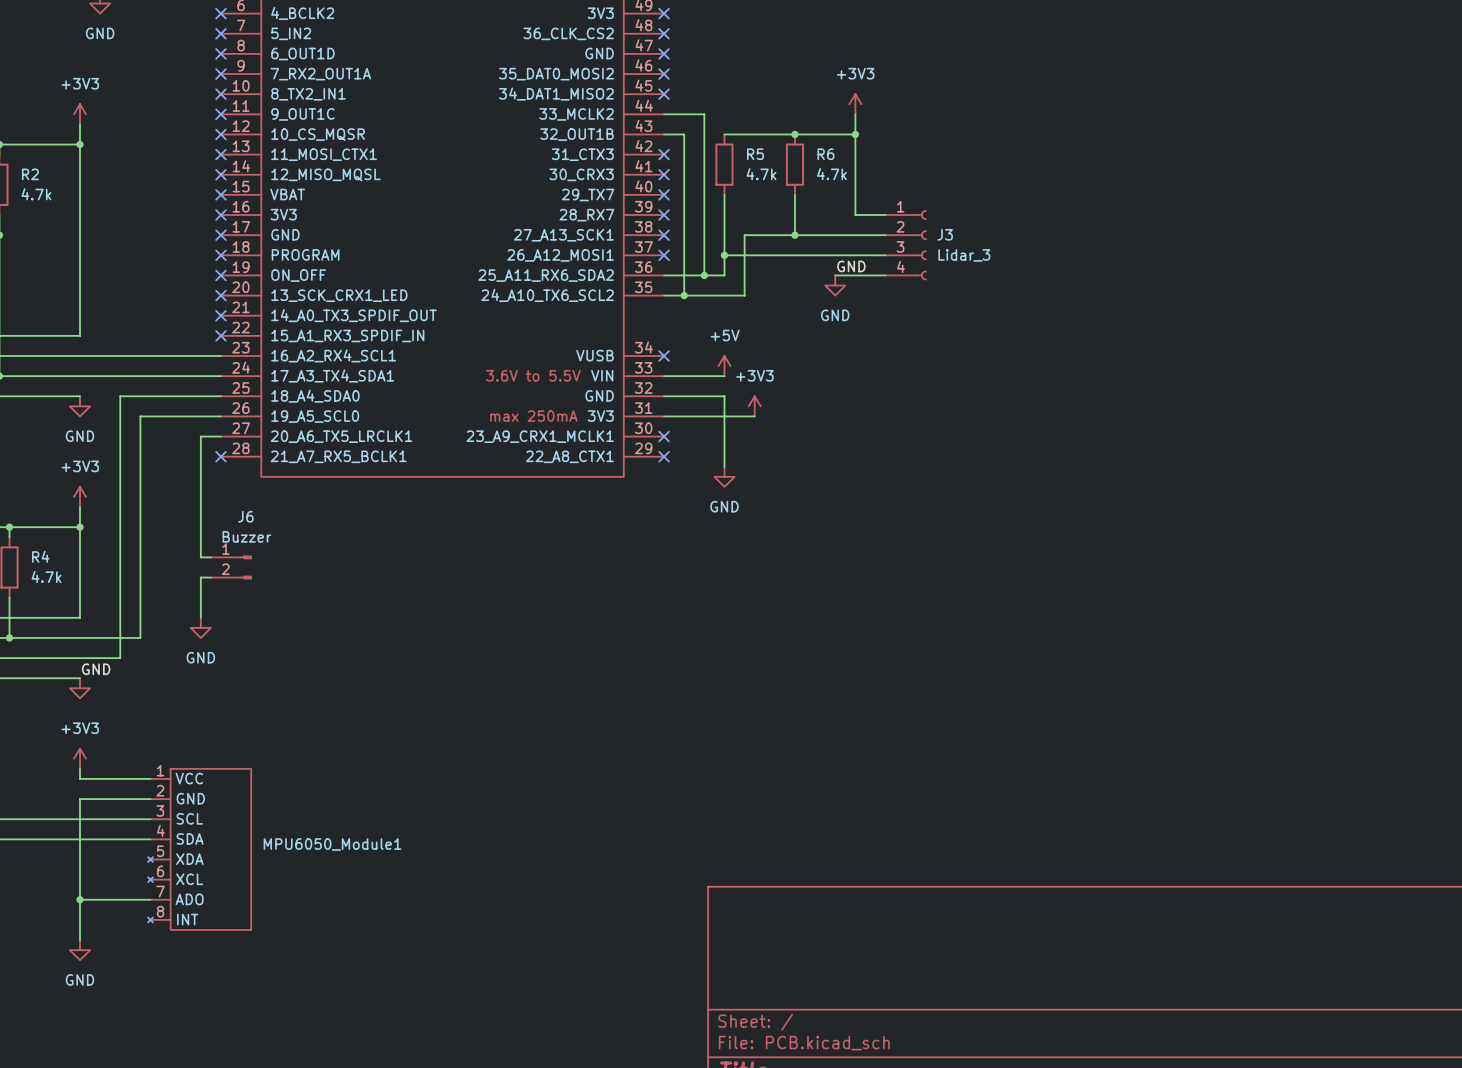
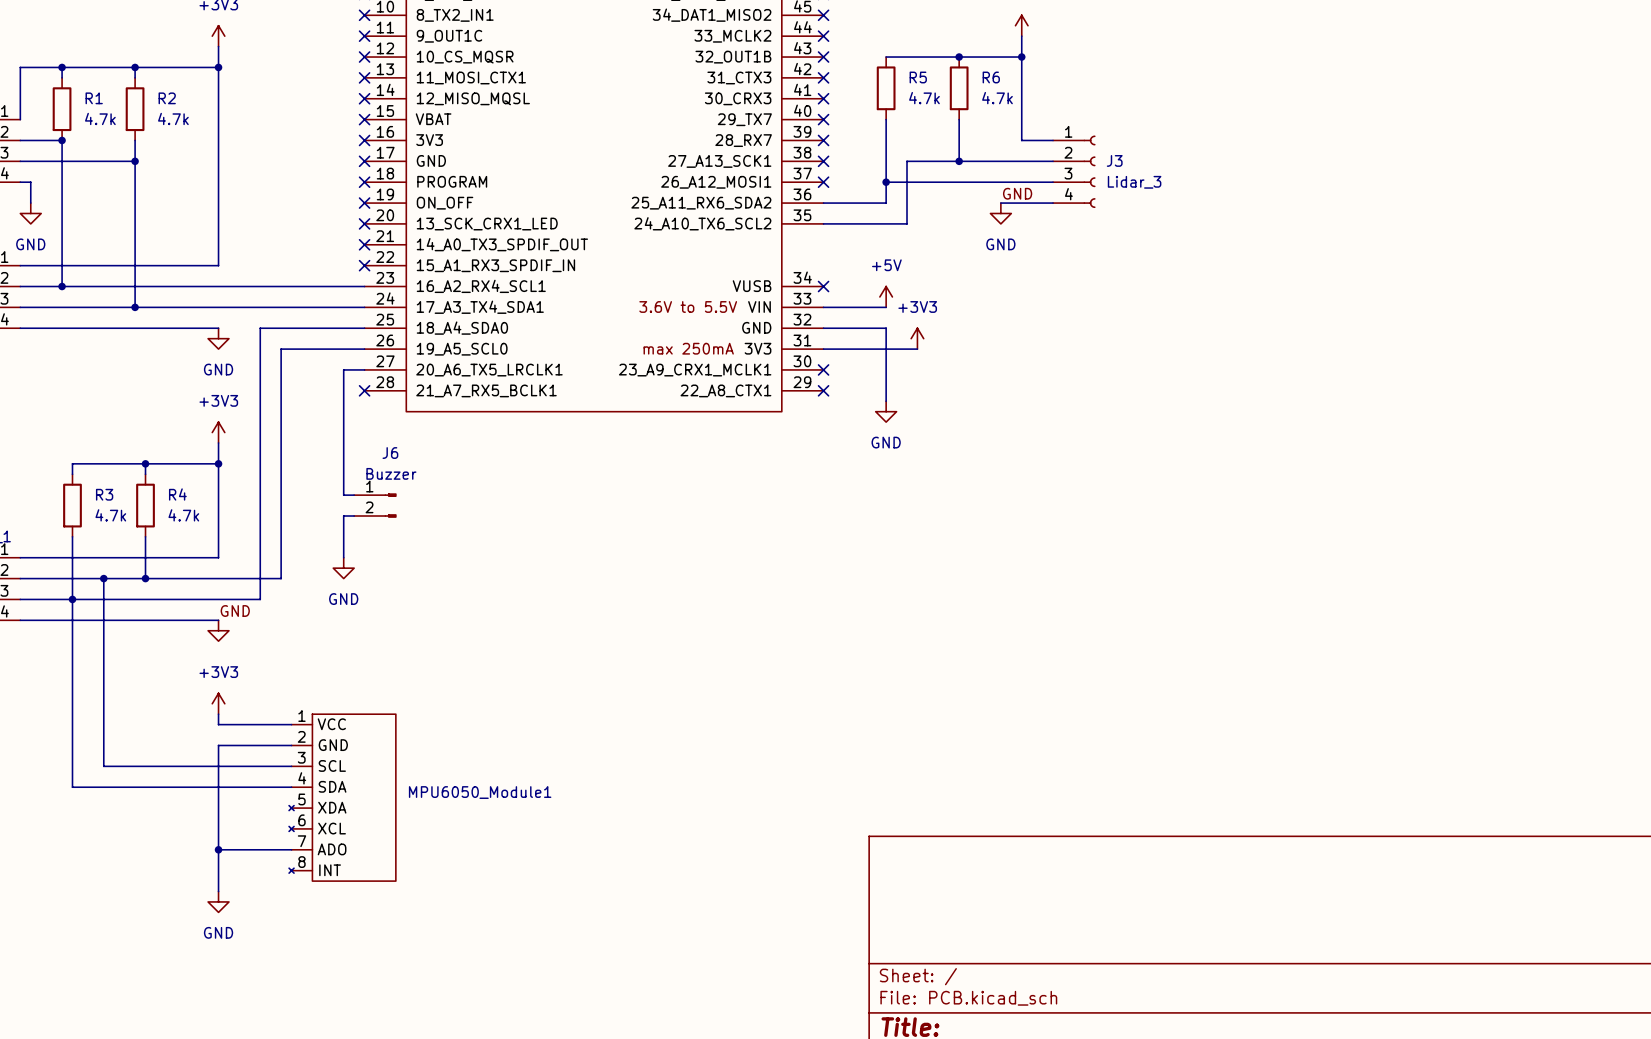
wire: (664, 114) (704, 114) (704, 275) -> none
no-connect mark: none -> (823, 36)
wire: (664, 134) (684, 134) (684, 295) -> none
no-connect mark: none -> (823, 57)
junction: (704, 275) -> none
junction: (684, 295) -> none

